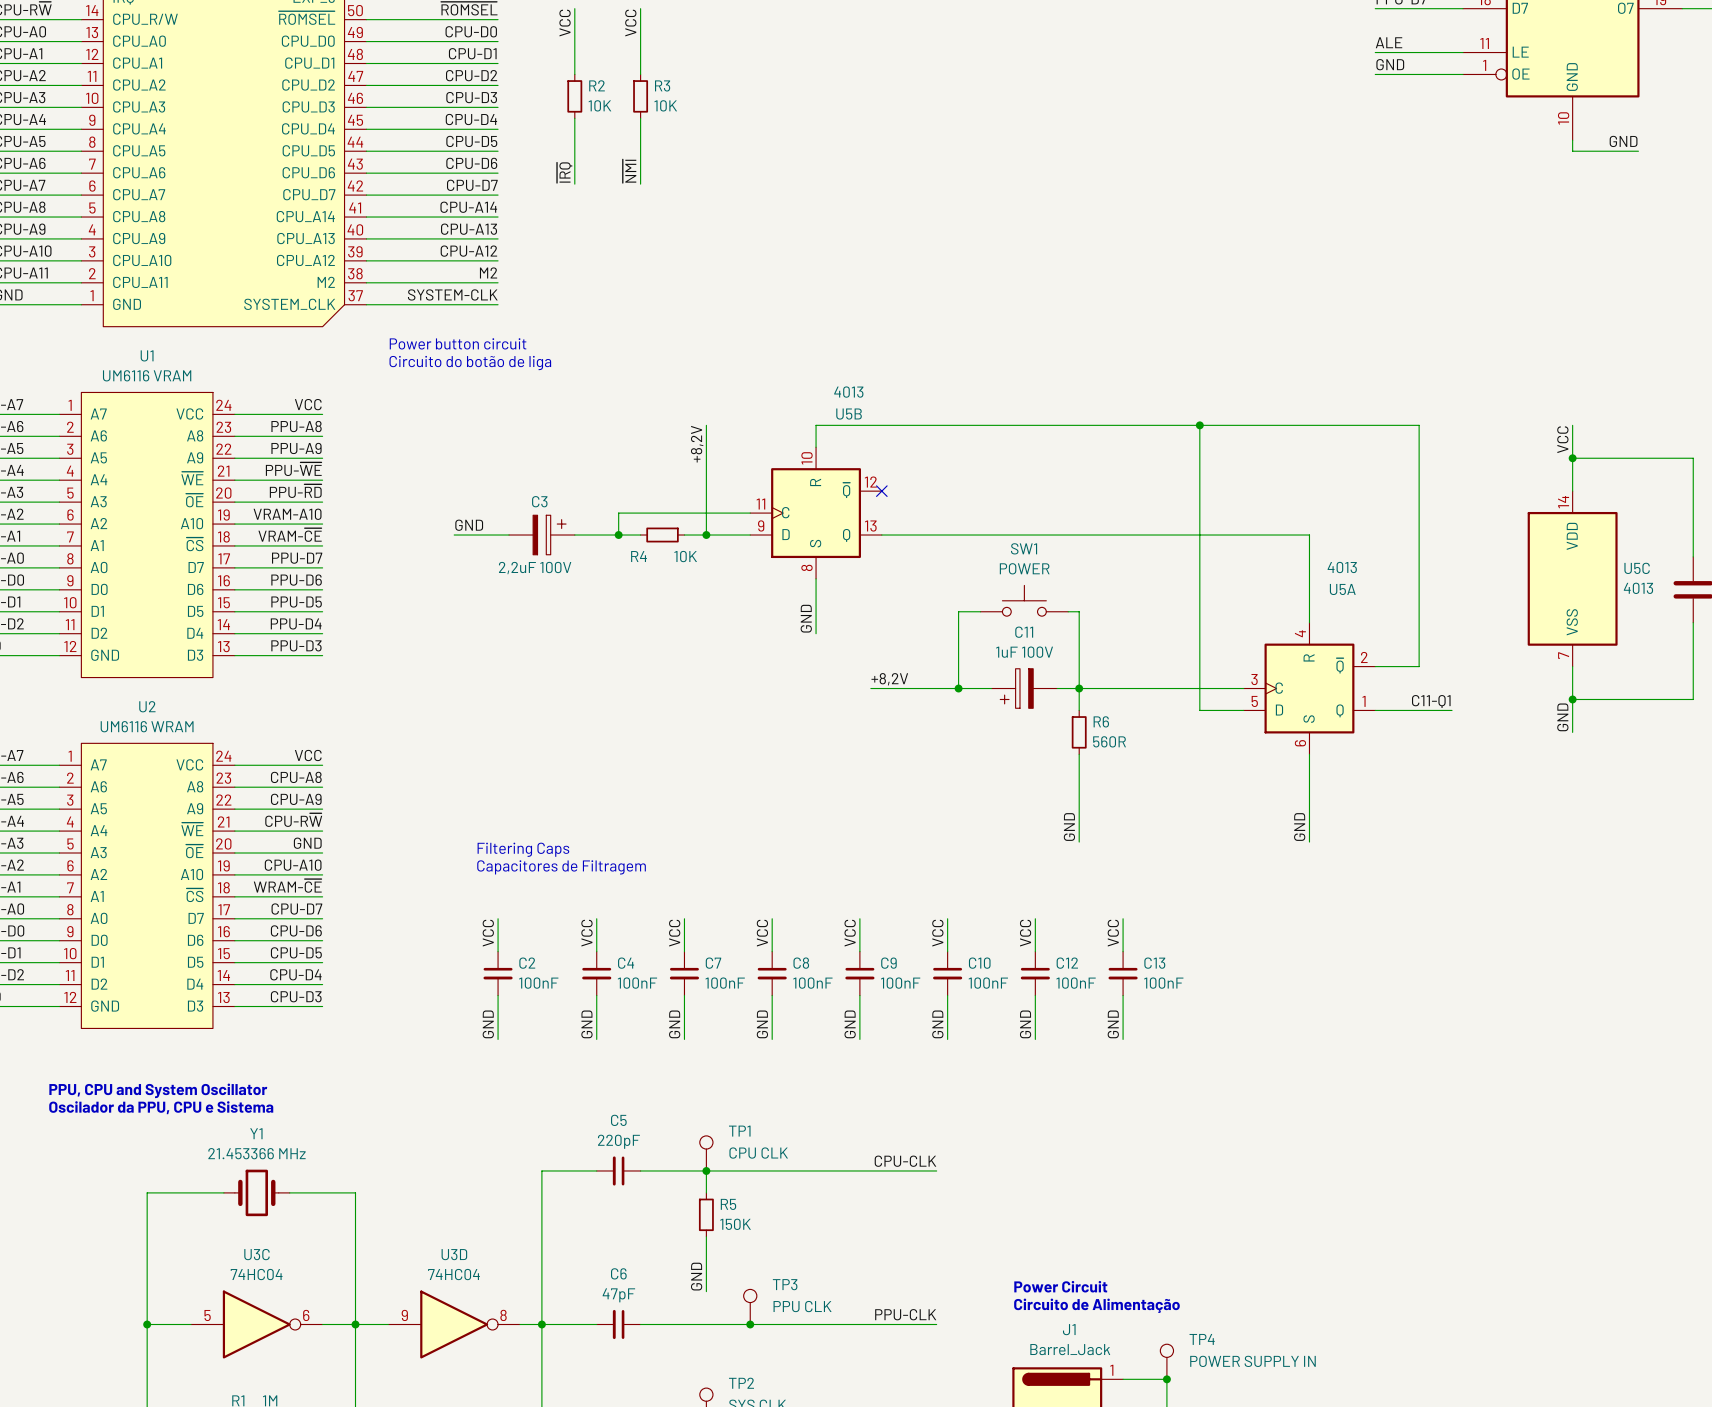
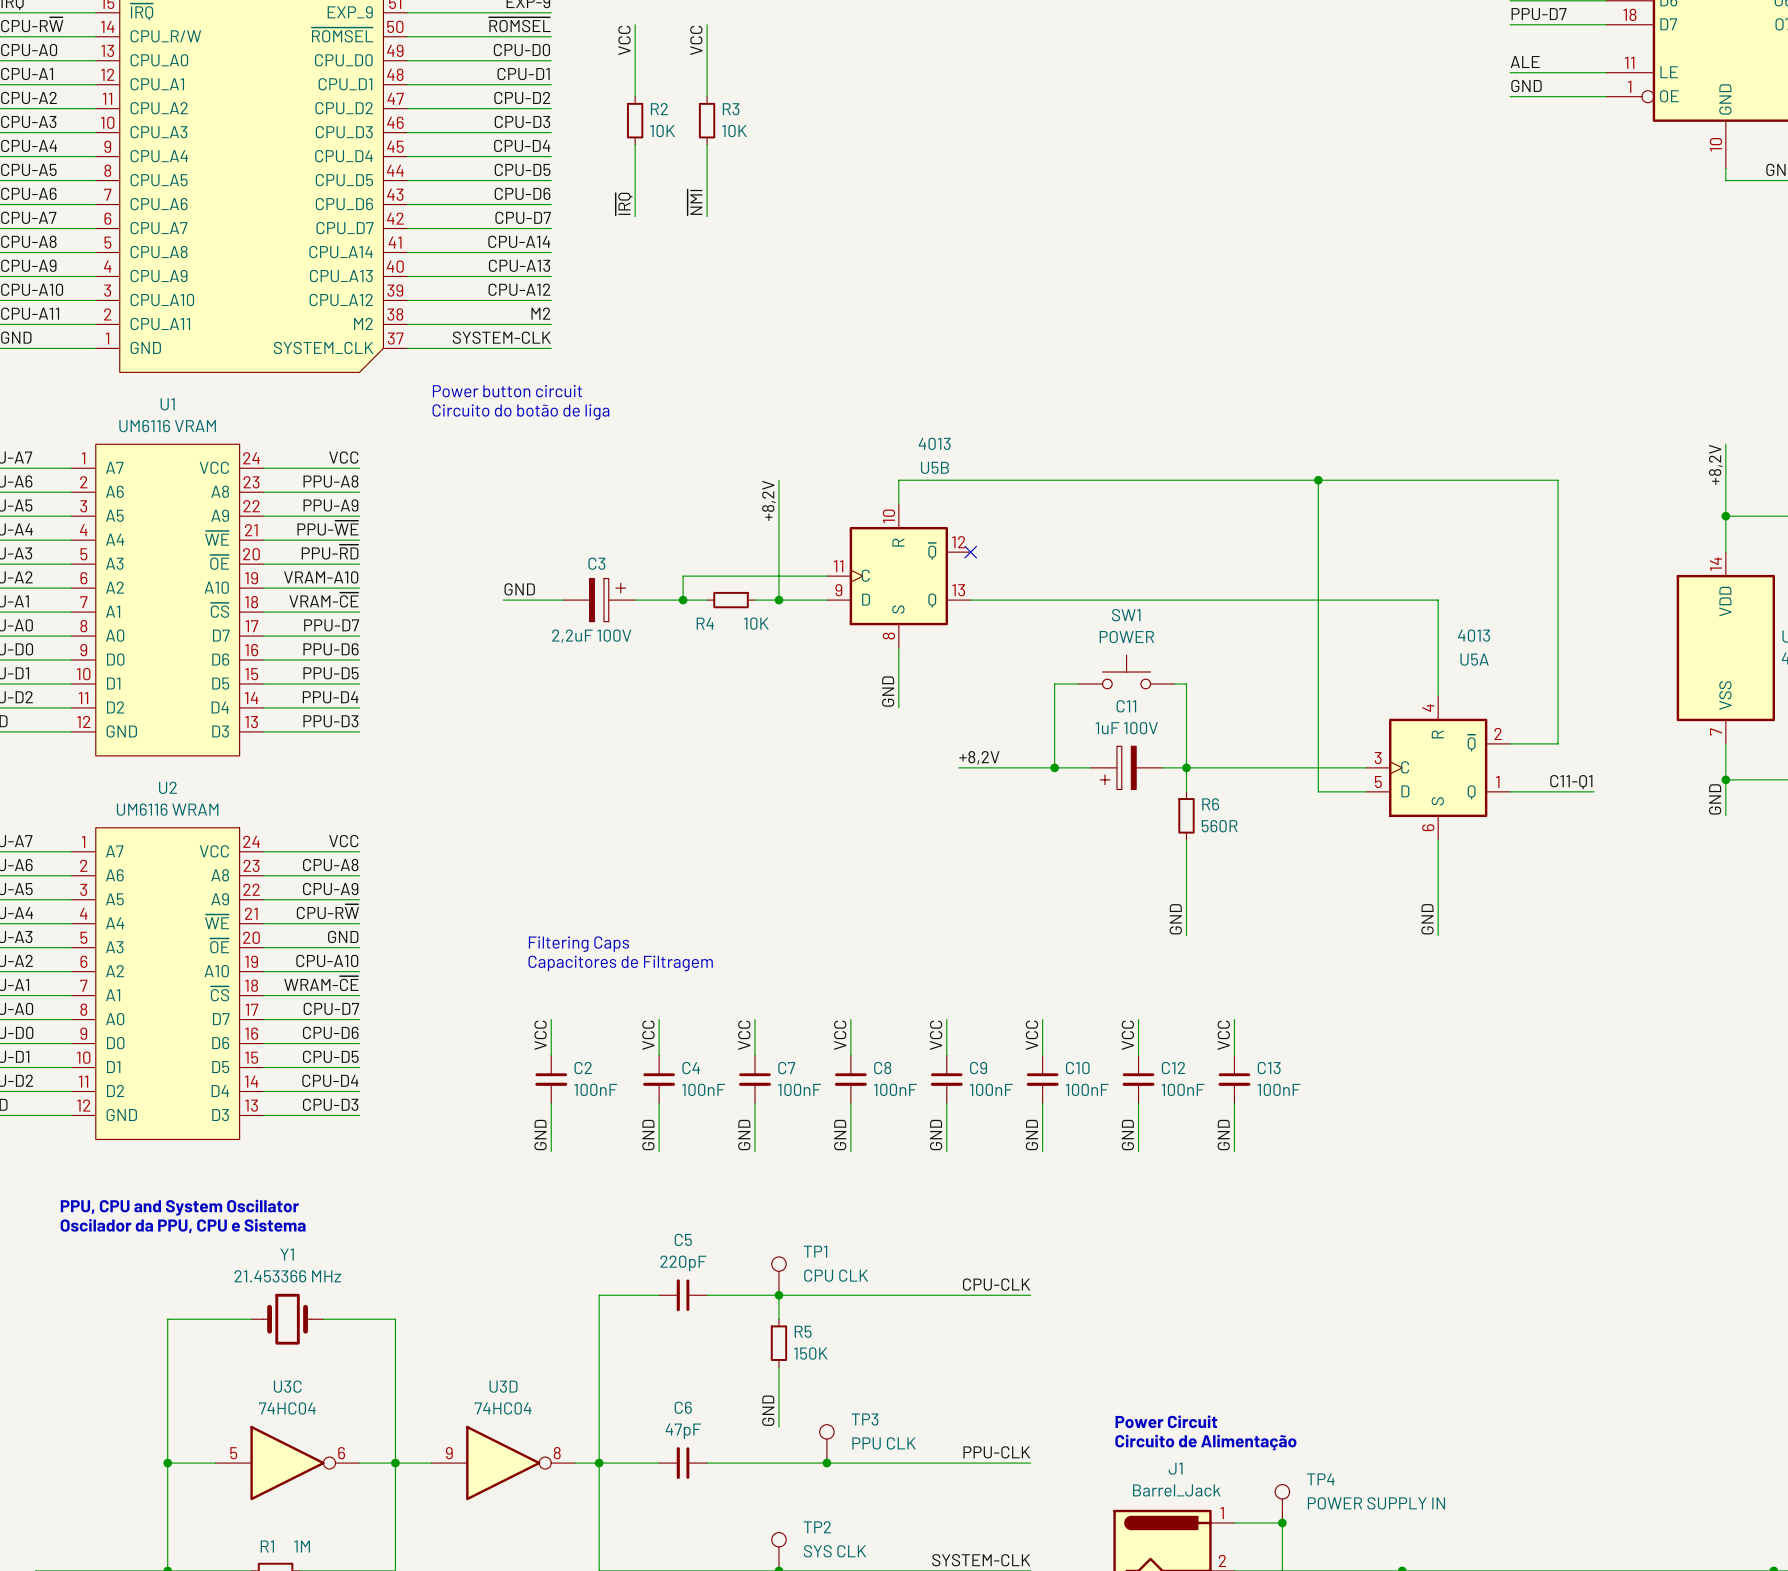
wire: none -> (1725, 444) (1725, 480)
label: none -> +8,2V (1715, 464)
label: VCC (1562, 439) -> none

